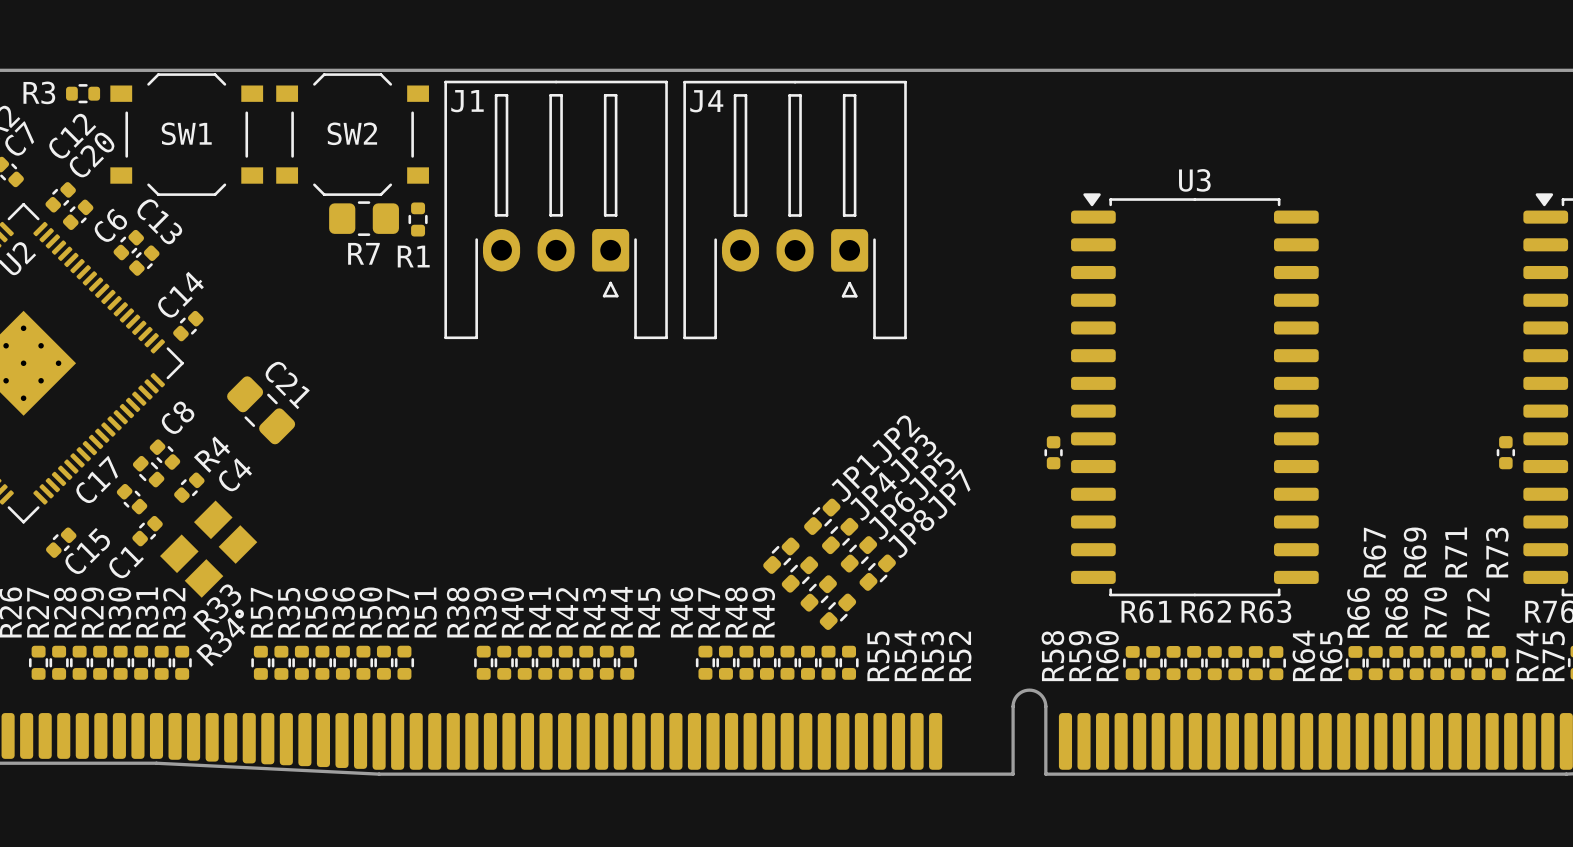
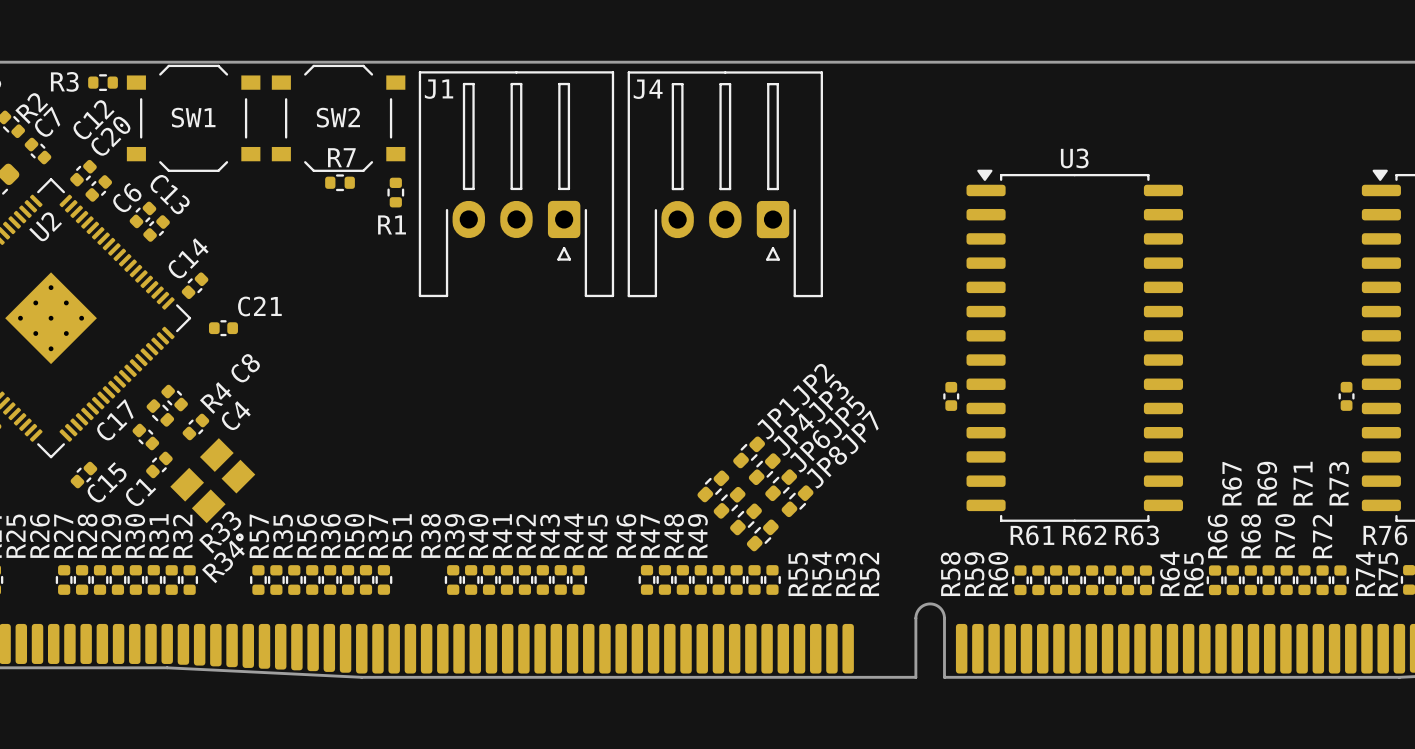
R7 footprint: [329, 201, 399, 236] -> [325, 174, 355, 192]
R7 name position: R7 (363, 253) -> R7 (341, 157)
C21 footprint: [227, 376, 296, 445] -> [208, 320, 238, 337]
C8 name position: C8 (177, 417) -> C8 (245, 368)

